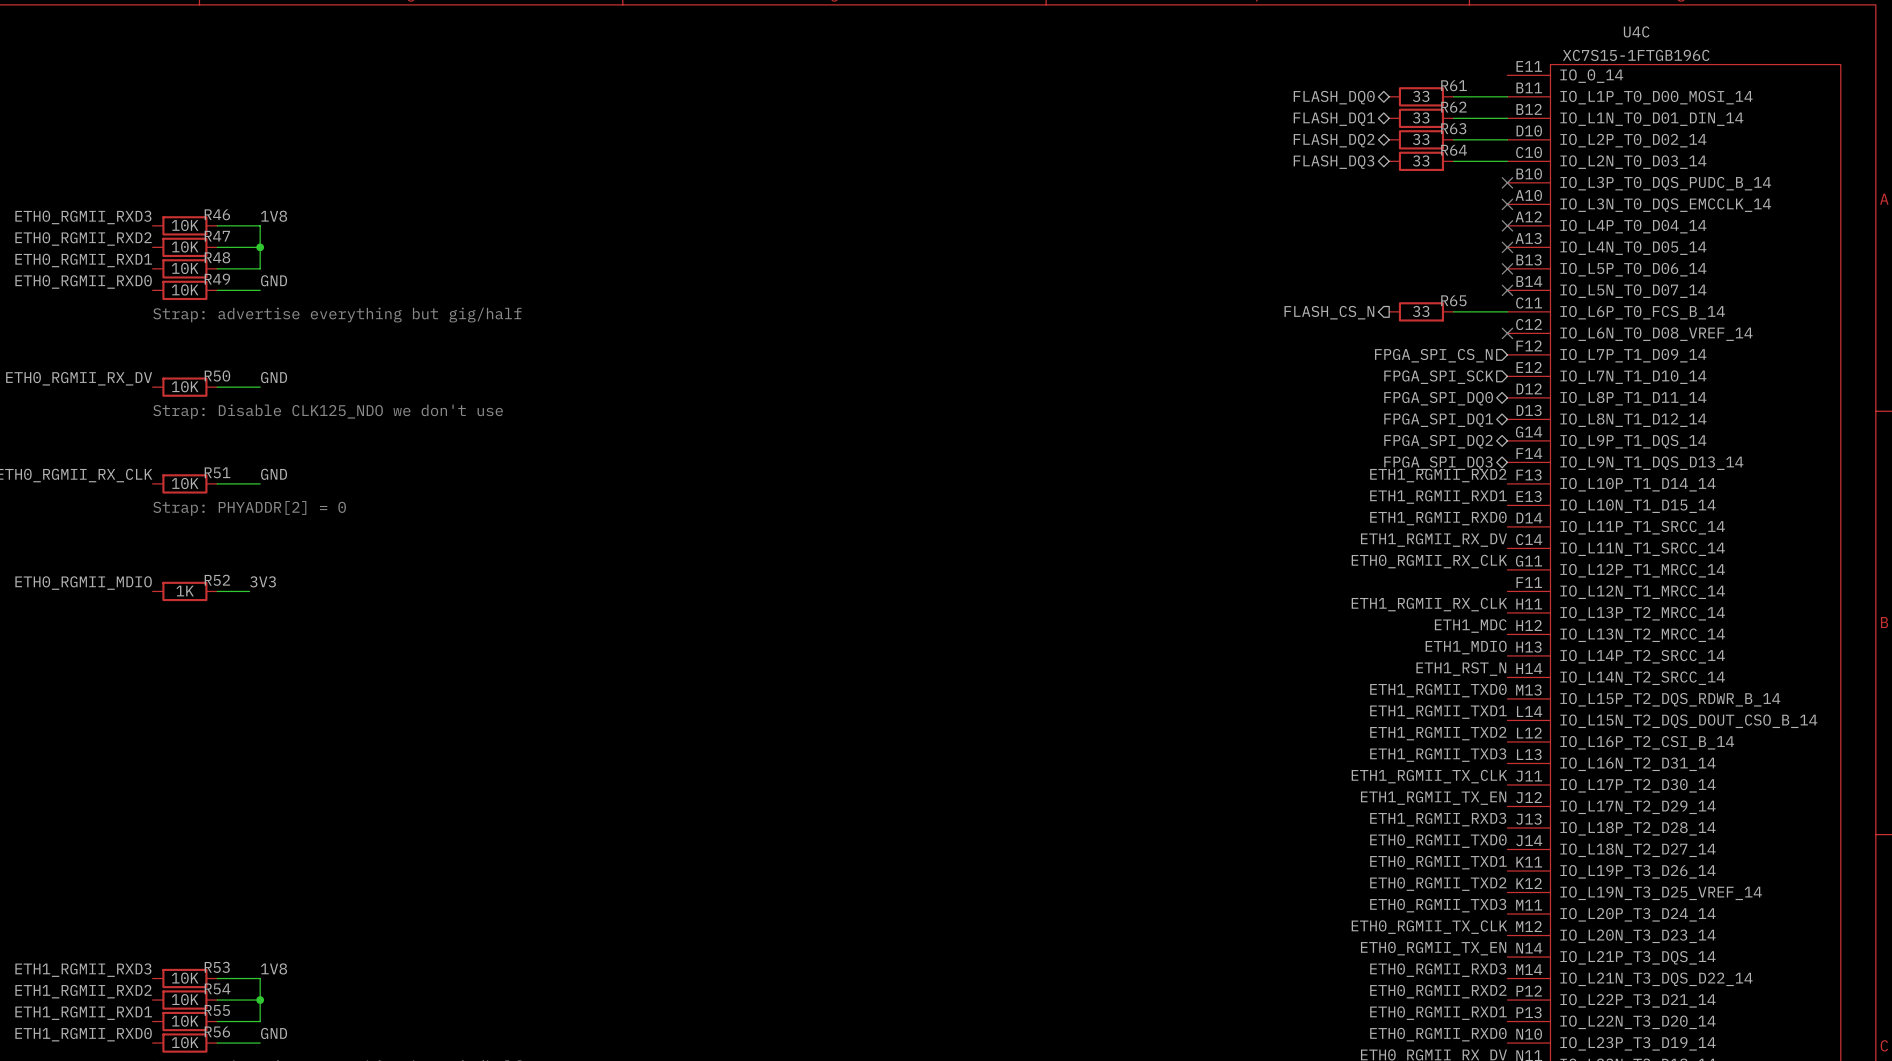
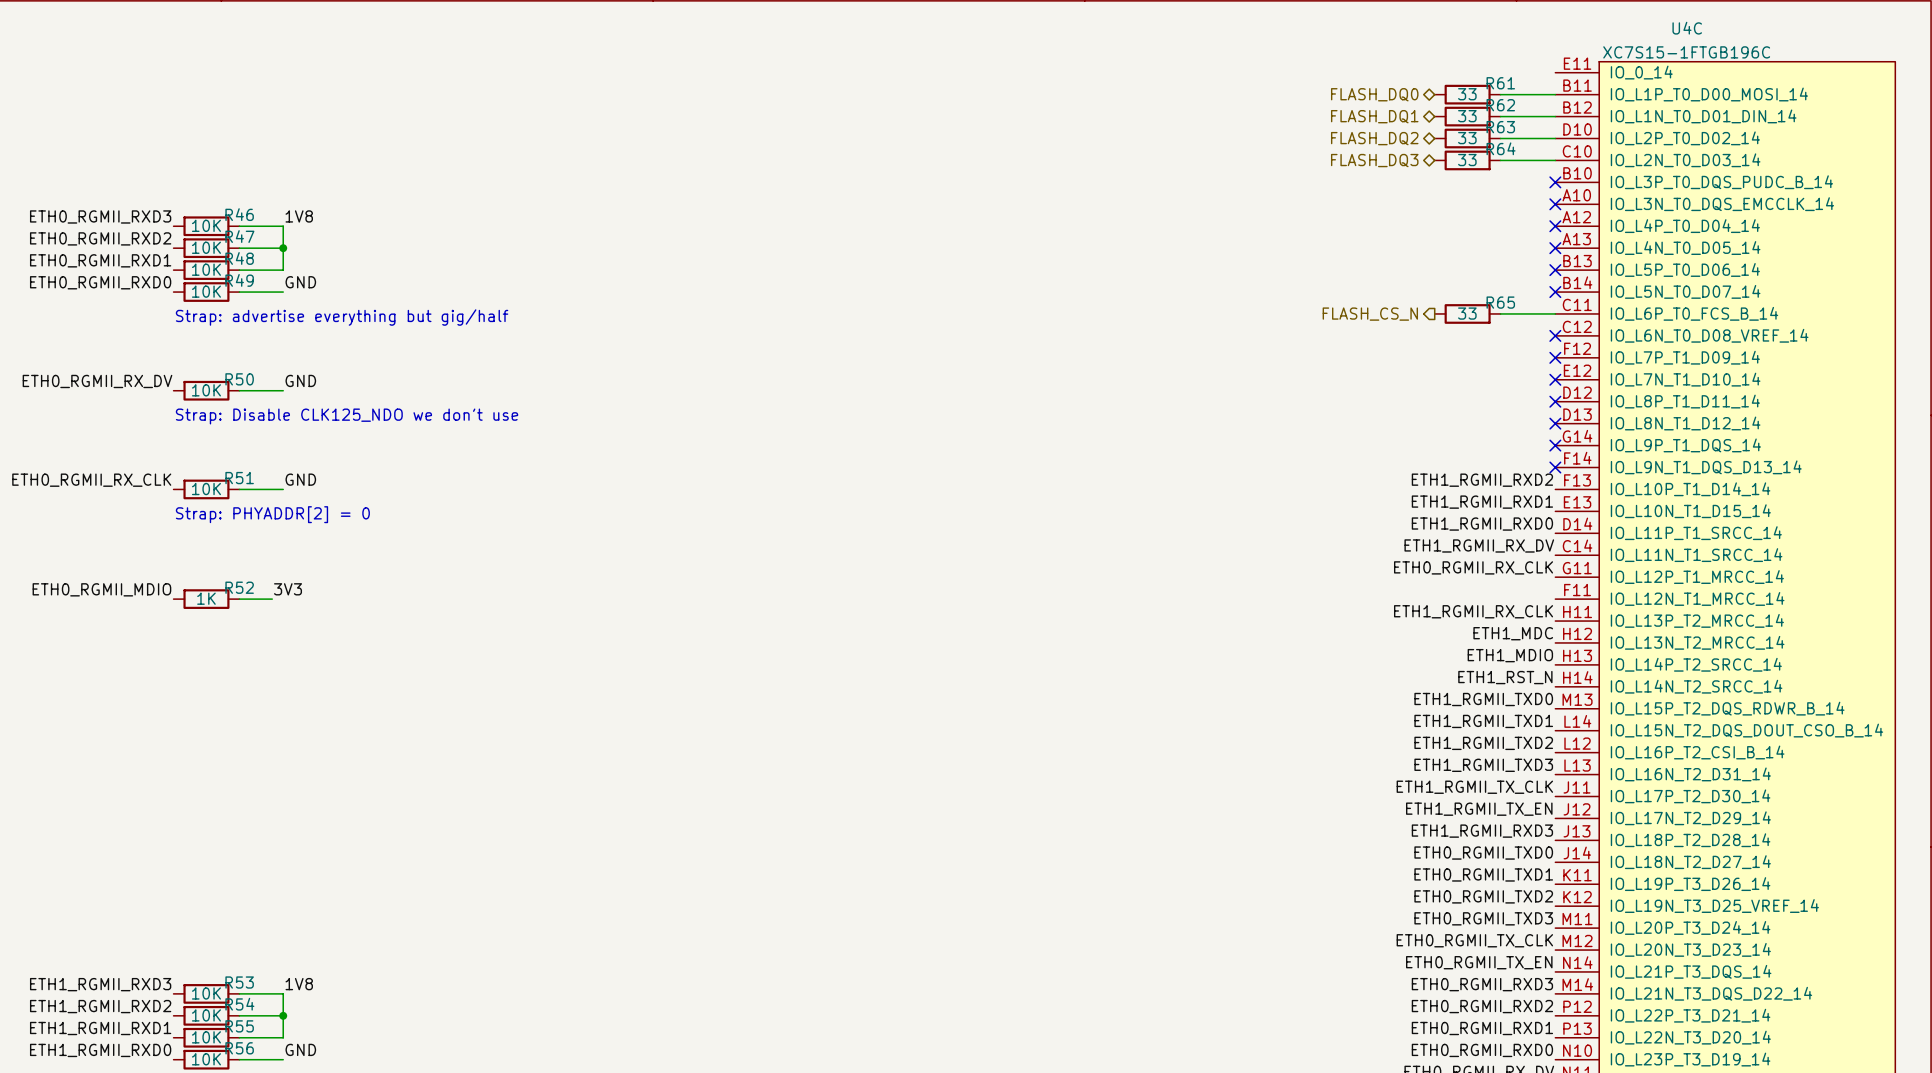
no-connect mark: none -> (1555, 357)
hierarchical label: FPGA_SPI_CS_N (1433, 355) -> none
no-connect mark: none -> (1555, 379)
hierarchical label: FPGA_SPI_SCK (1438, 377) -> none
no-connect mark: none -> (1555, 401)
hierarchical label: FPGA_SPI_DQ0 (1438, 398) -> none
no-connect mark: none -> (1555, 423)
hierarchical label: FPGA_SPI_DQ1 (1438, 420) -> none
no-connect mark: none -> (1555, 445)
hierarchical label: FPGA_SPI_DQ2 (1438, 441) -> none
no-connect mark: none -> (1555, 467)
hierarchical label: FPGA_SPI_DQ3 (1438, 463) -> none

